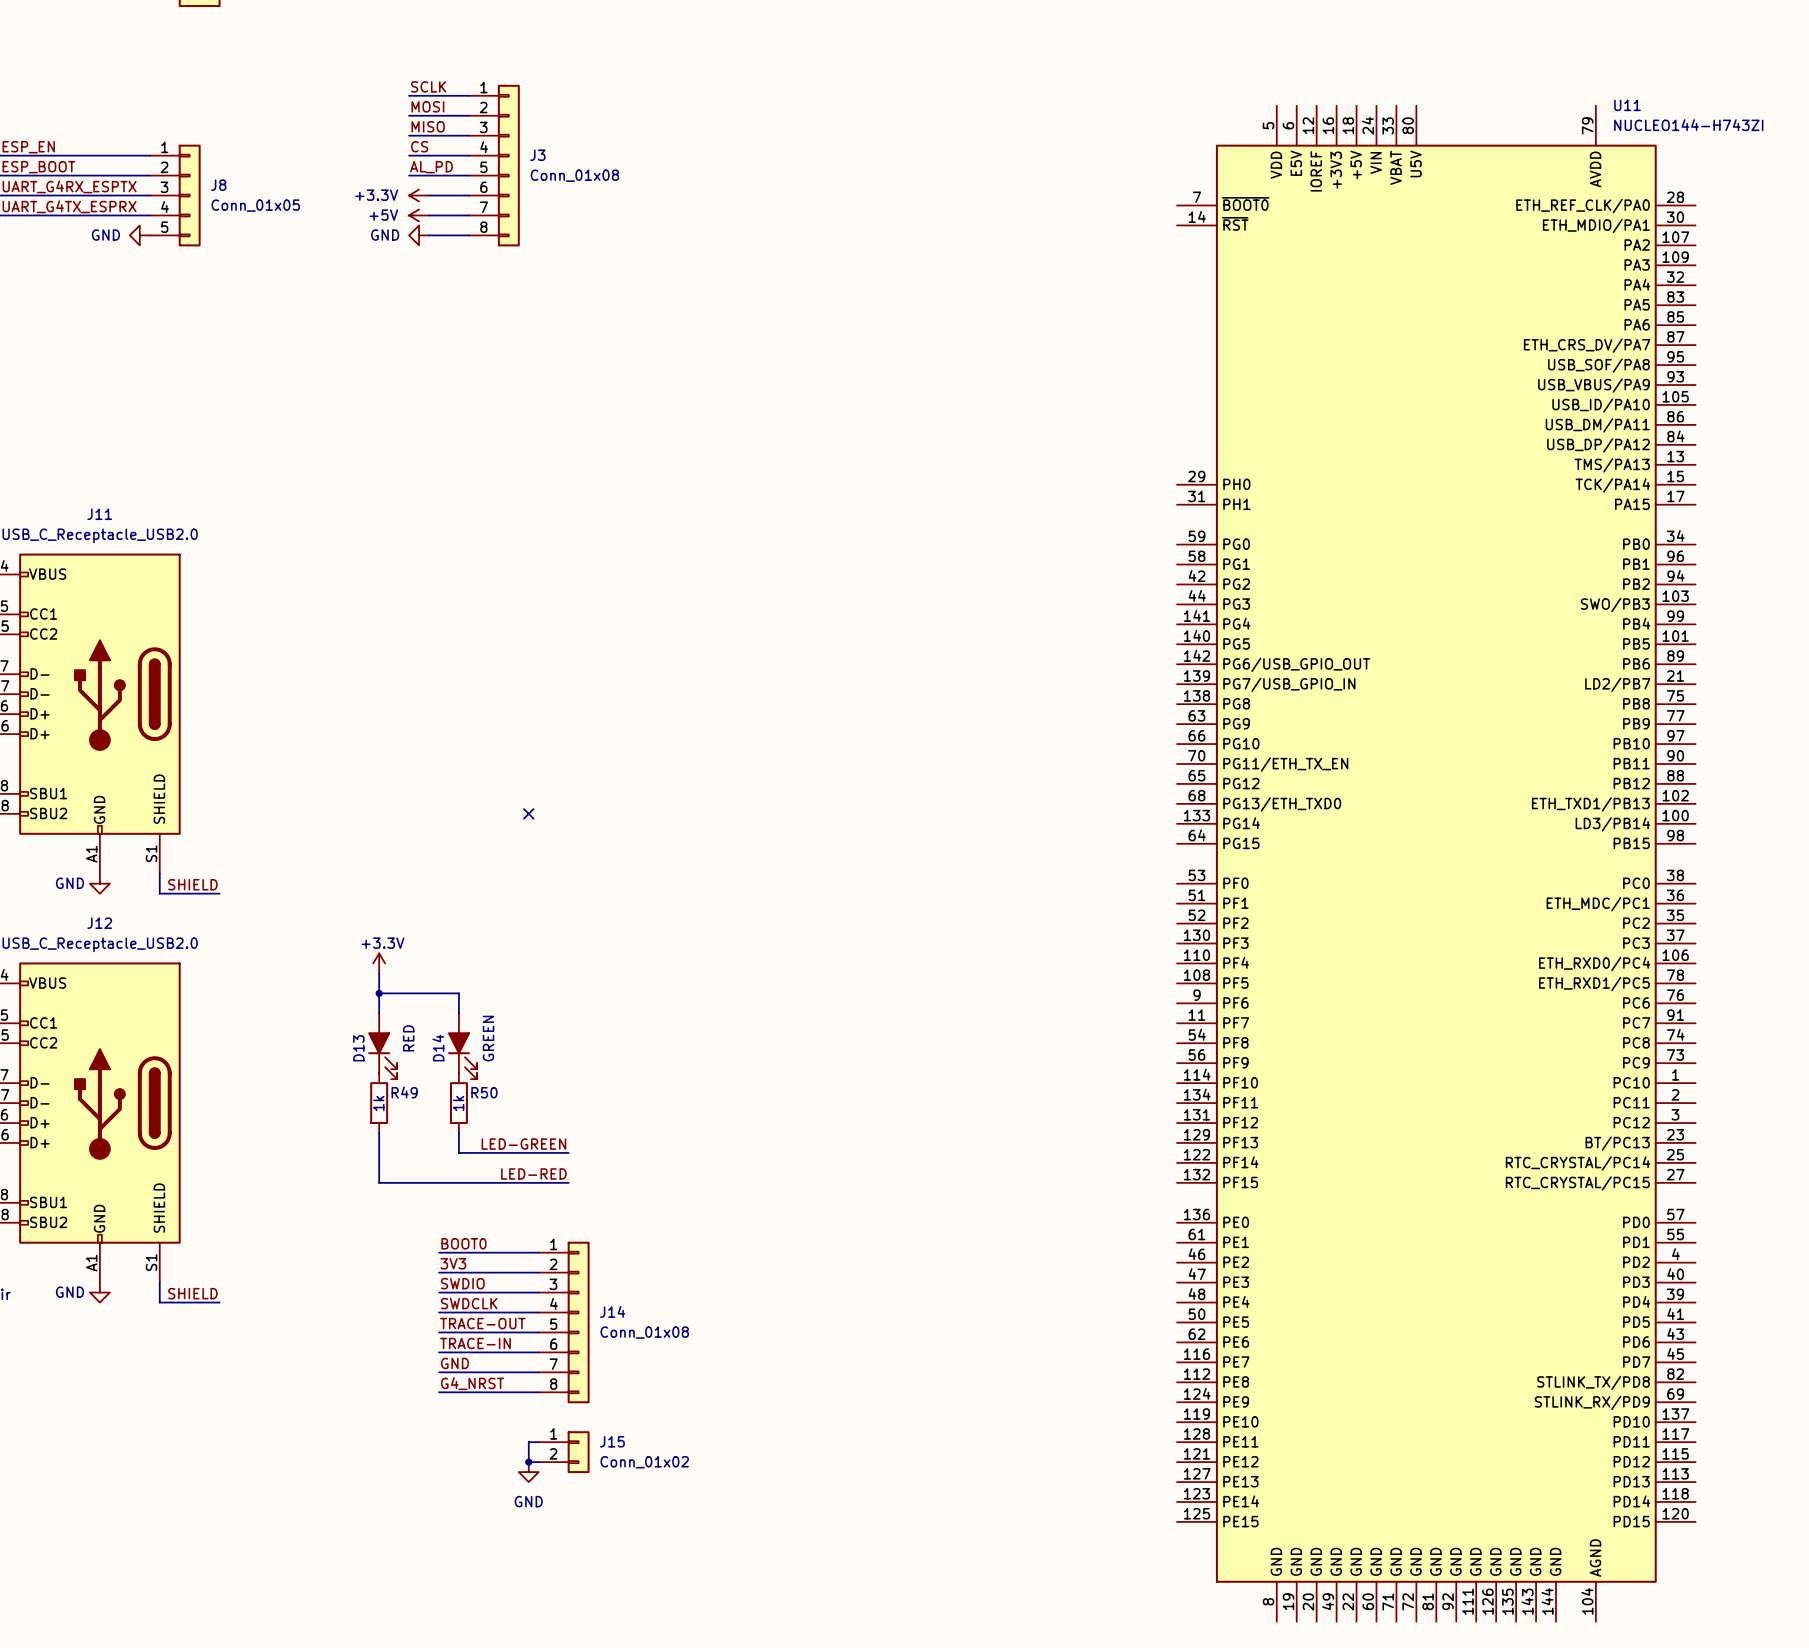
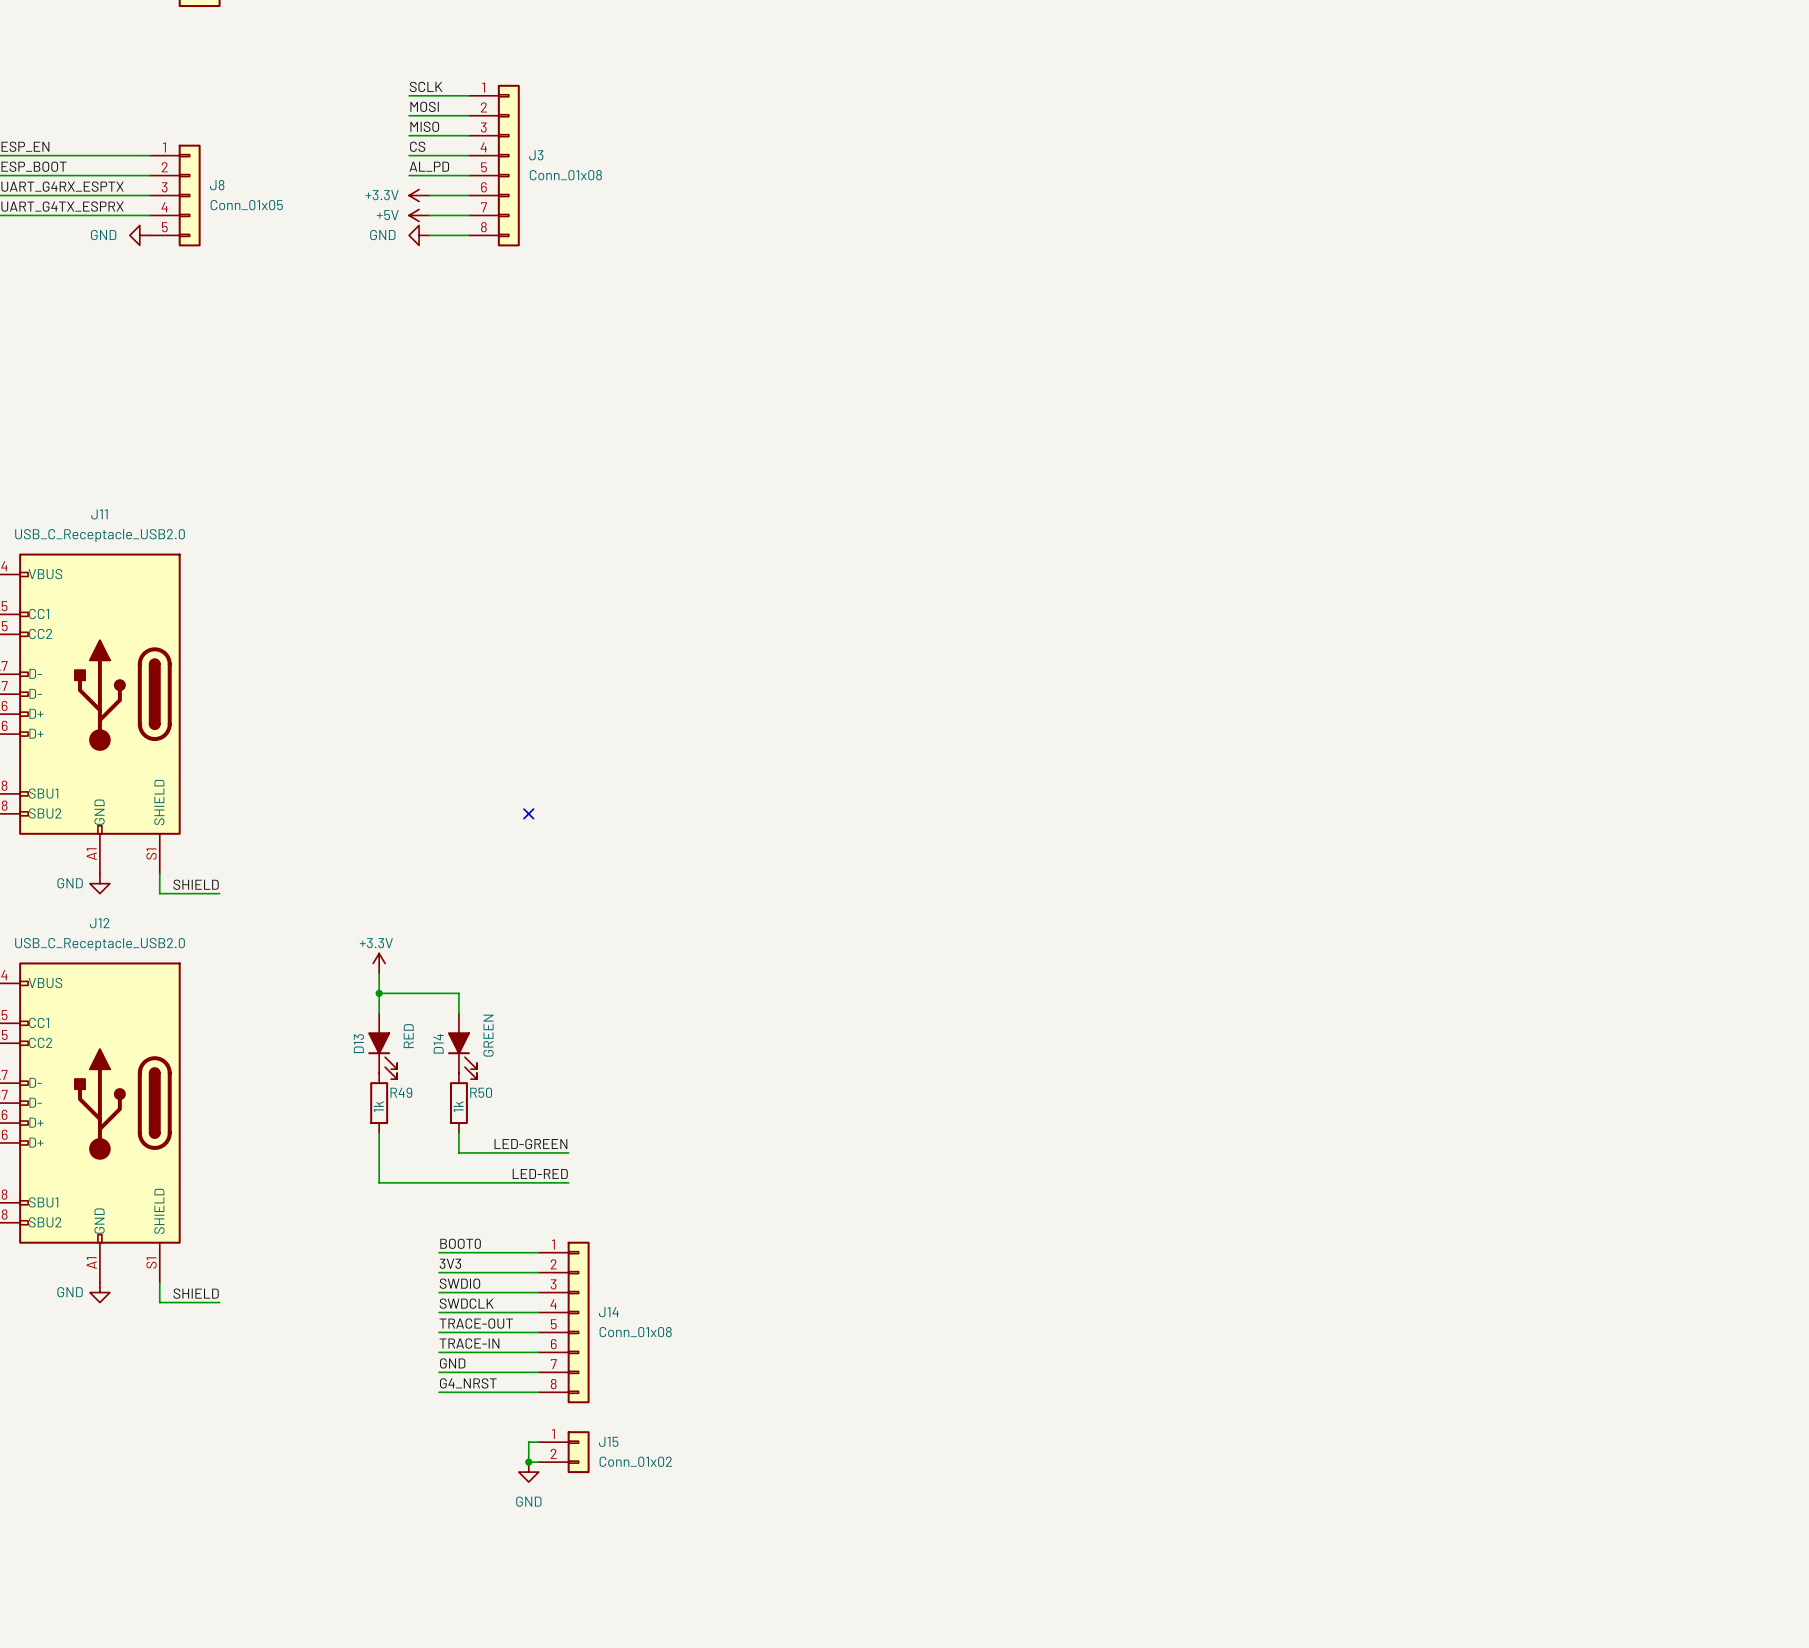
U11: NUCLEO144-H743ZI (1436, 863) -> none

